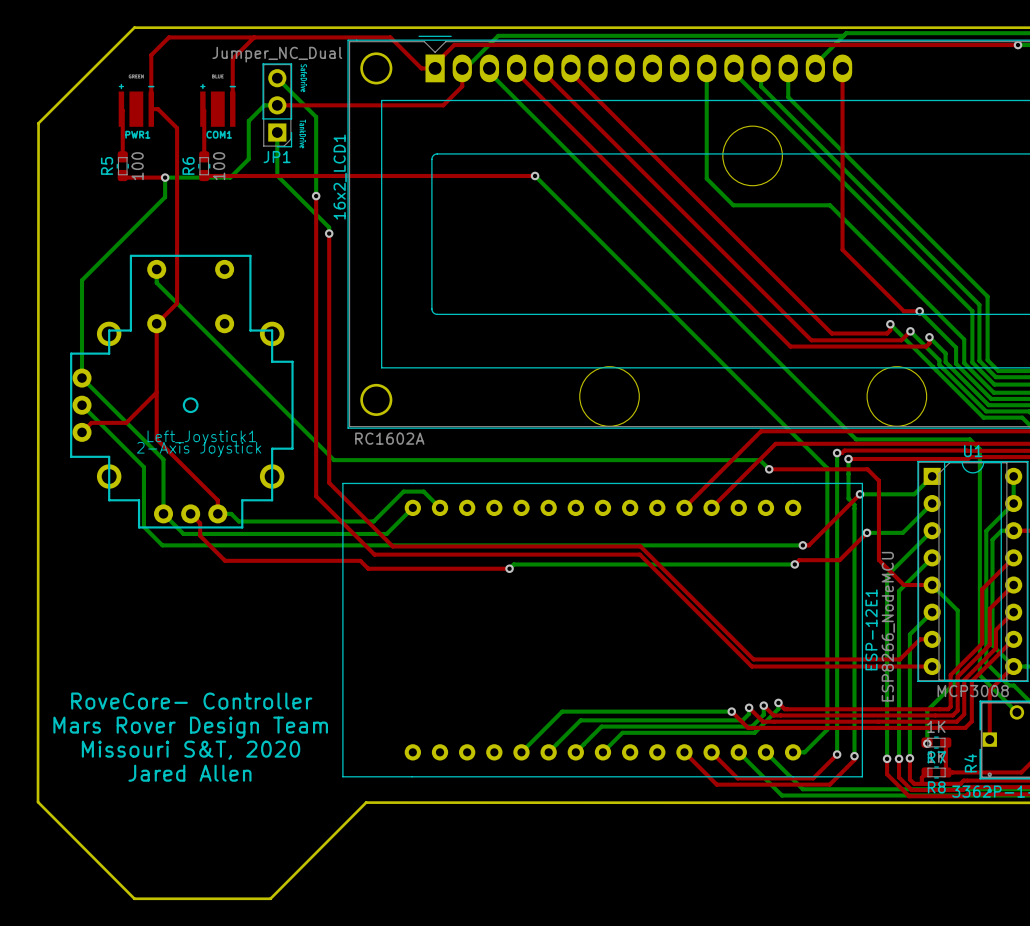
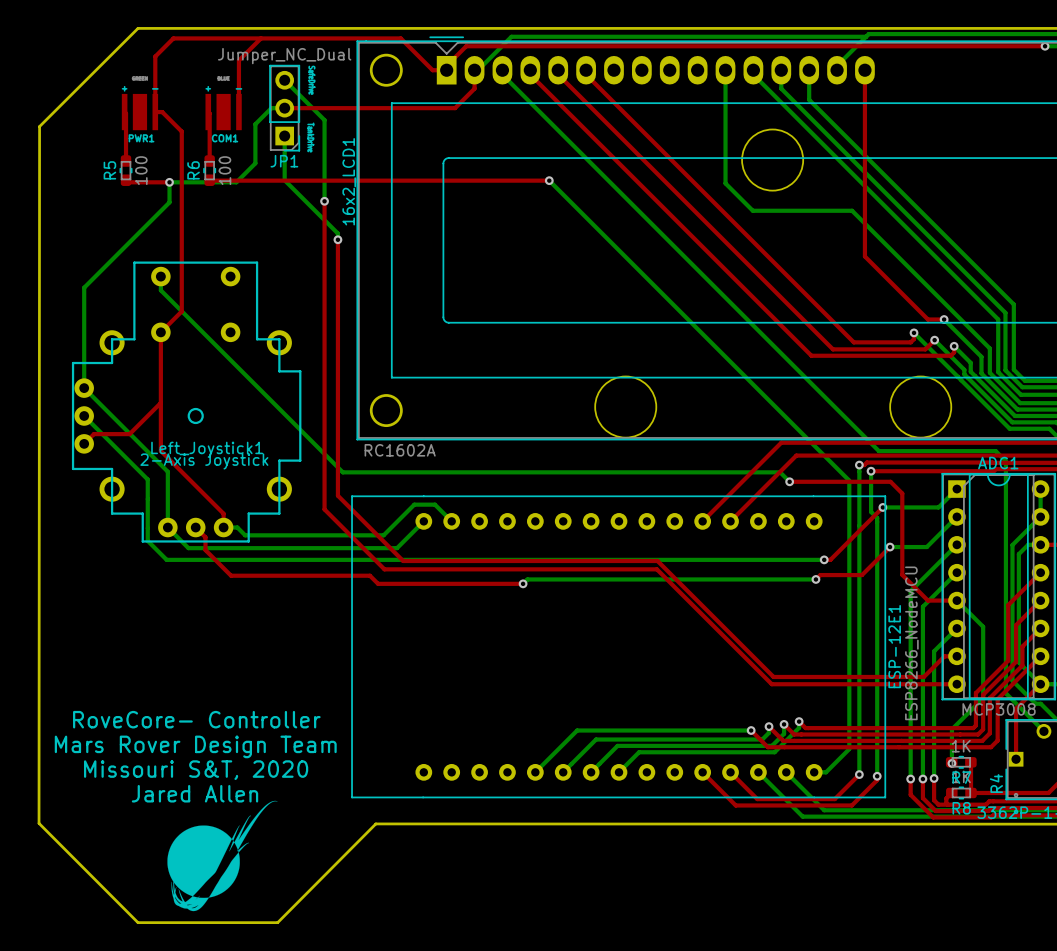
U1 name: U1 (973, 451) -> ADC1 (998, 463)
drawing: none -> [167, 800, 278, 912]

